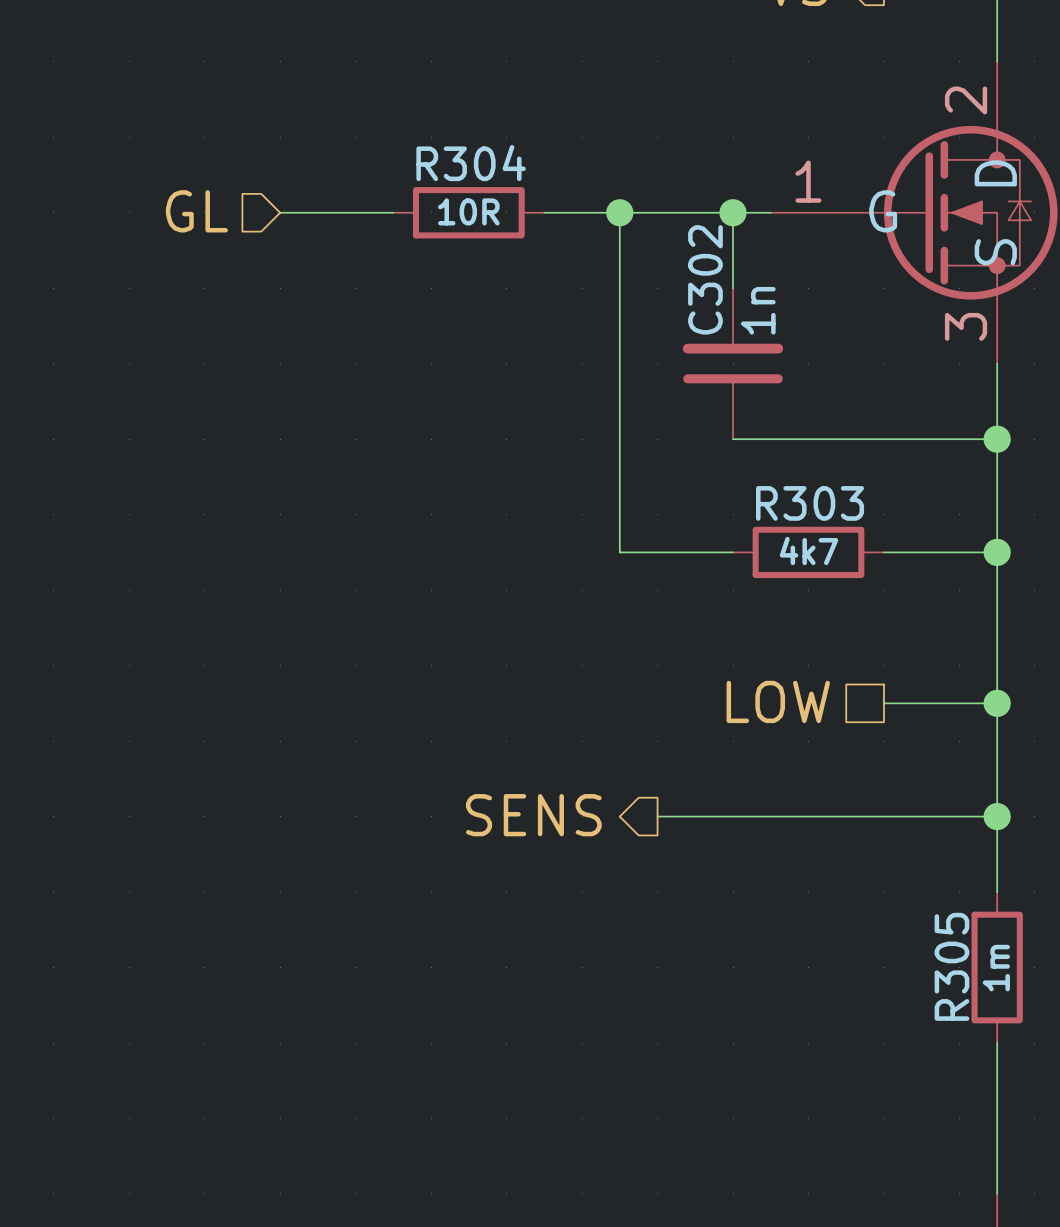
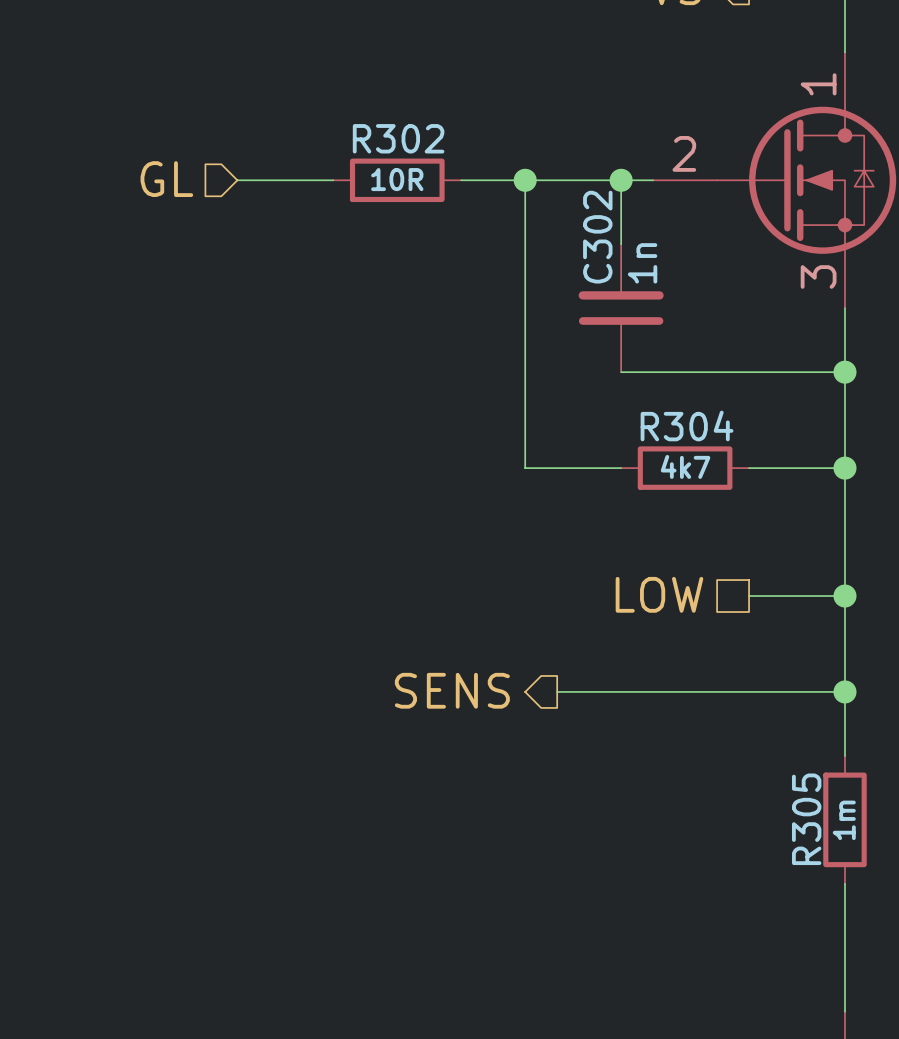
part pin number: 2 (966, 100) -> 1 (818, 84)
R304 name: R304 (471, 163) -> R302 (398, 138)
part pin name: D (995, 173) -> none
part pin number: 1 (808, 181) -> 2 (684, 153)
part pin name: G (883, 211) -> none
part pin name: S (995, 252) -> none
R303 name: R303 (810, 503) -> R304 (687, 425)

